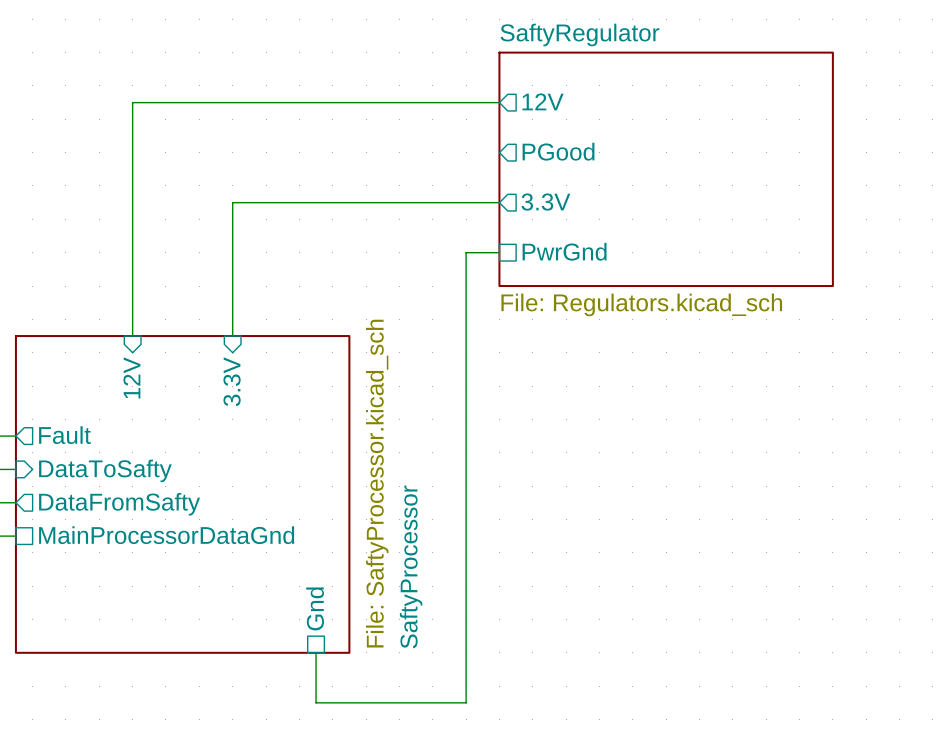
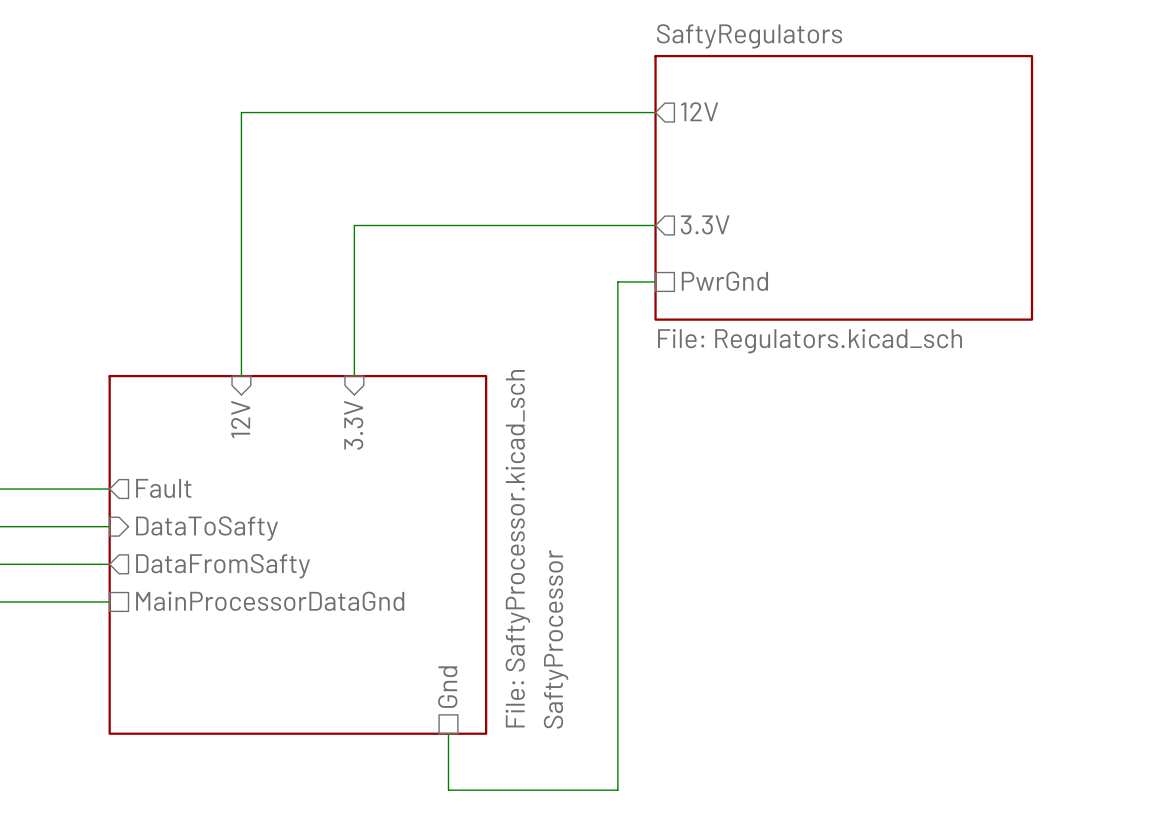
sheet SaftyRegulator name: SaftyRegulator (579, 34) -> SaftyRegulators (749, 36)
sheet pin: PGood (558, 151) -> none

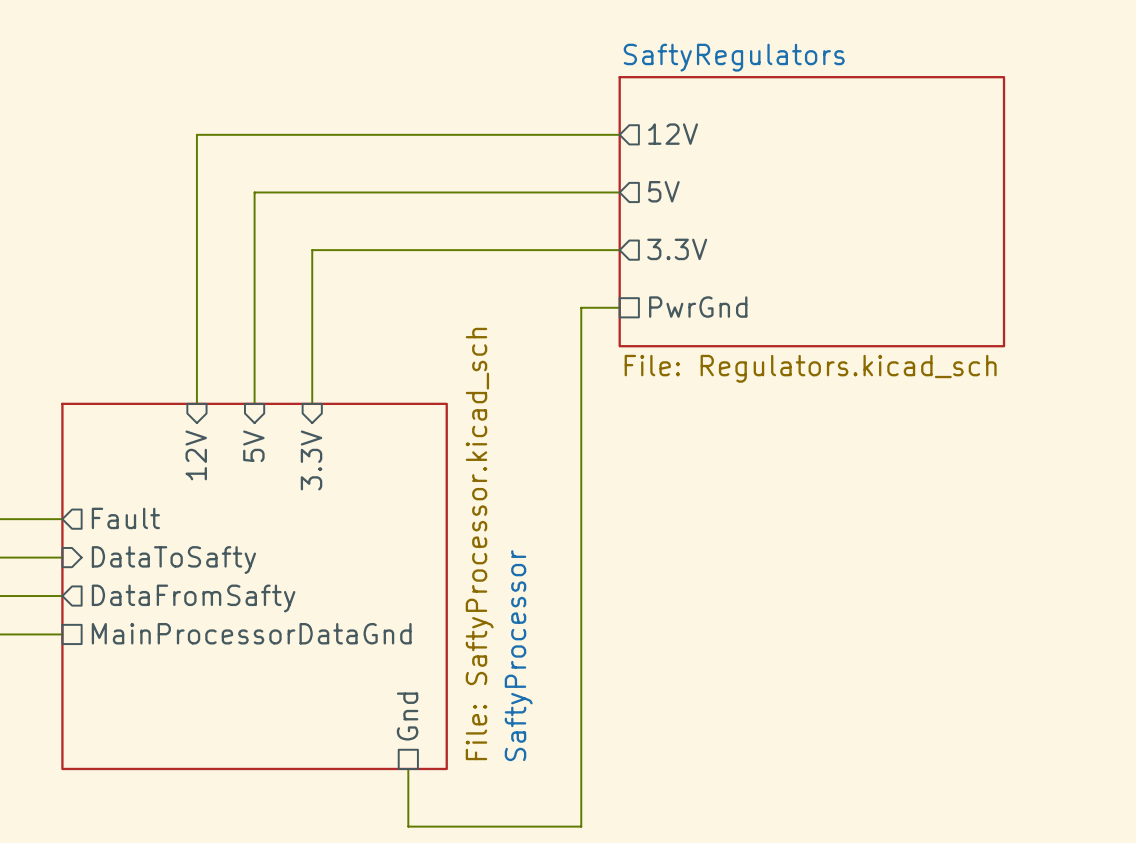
sheet pin: none -> 5V (663, 191)
wire: none -> (619, 192) (254, 192) (254, 403)
sheet pin: none -> 5V (253, 446)

